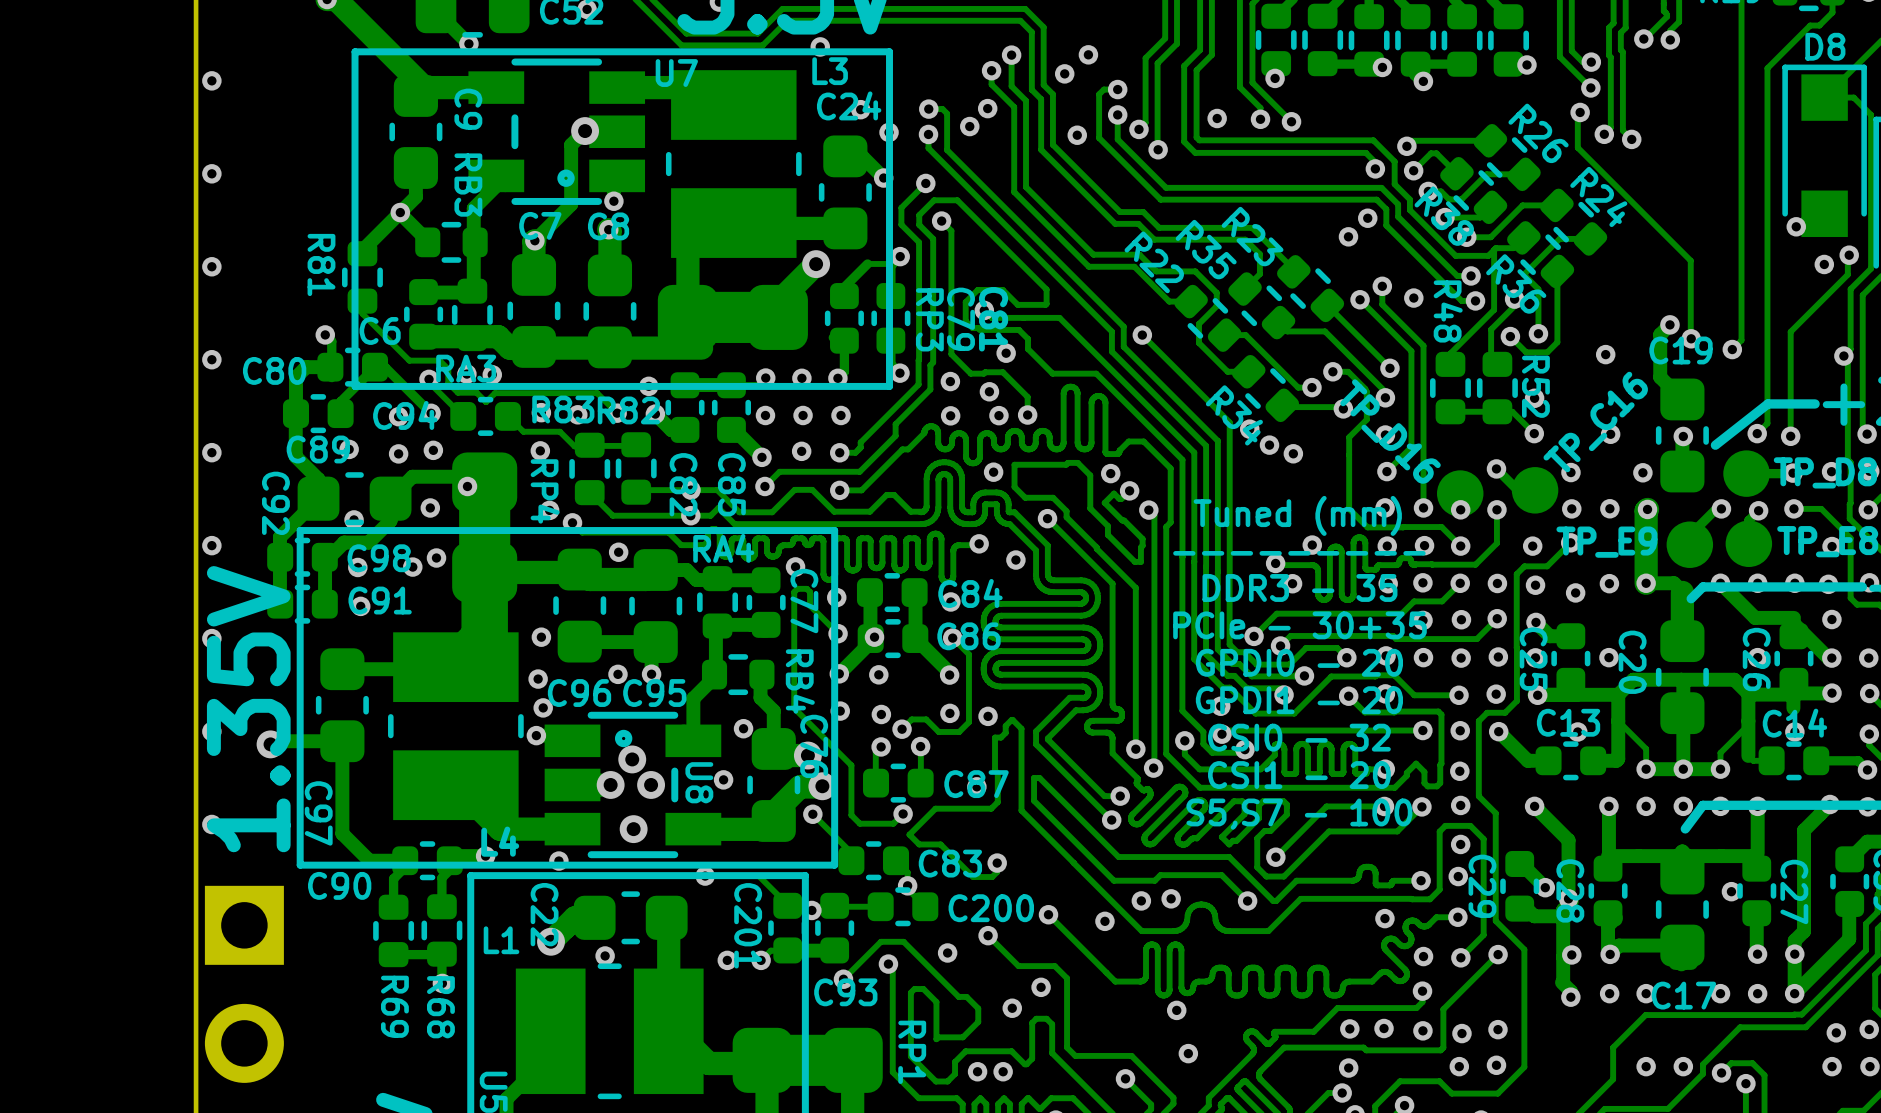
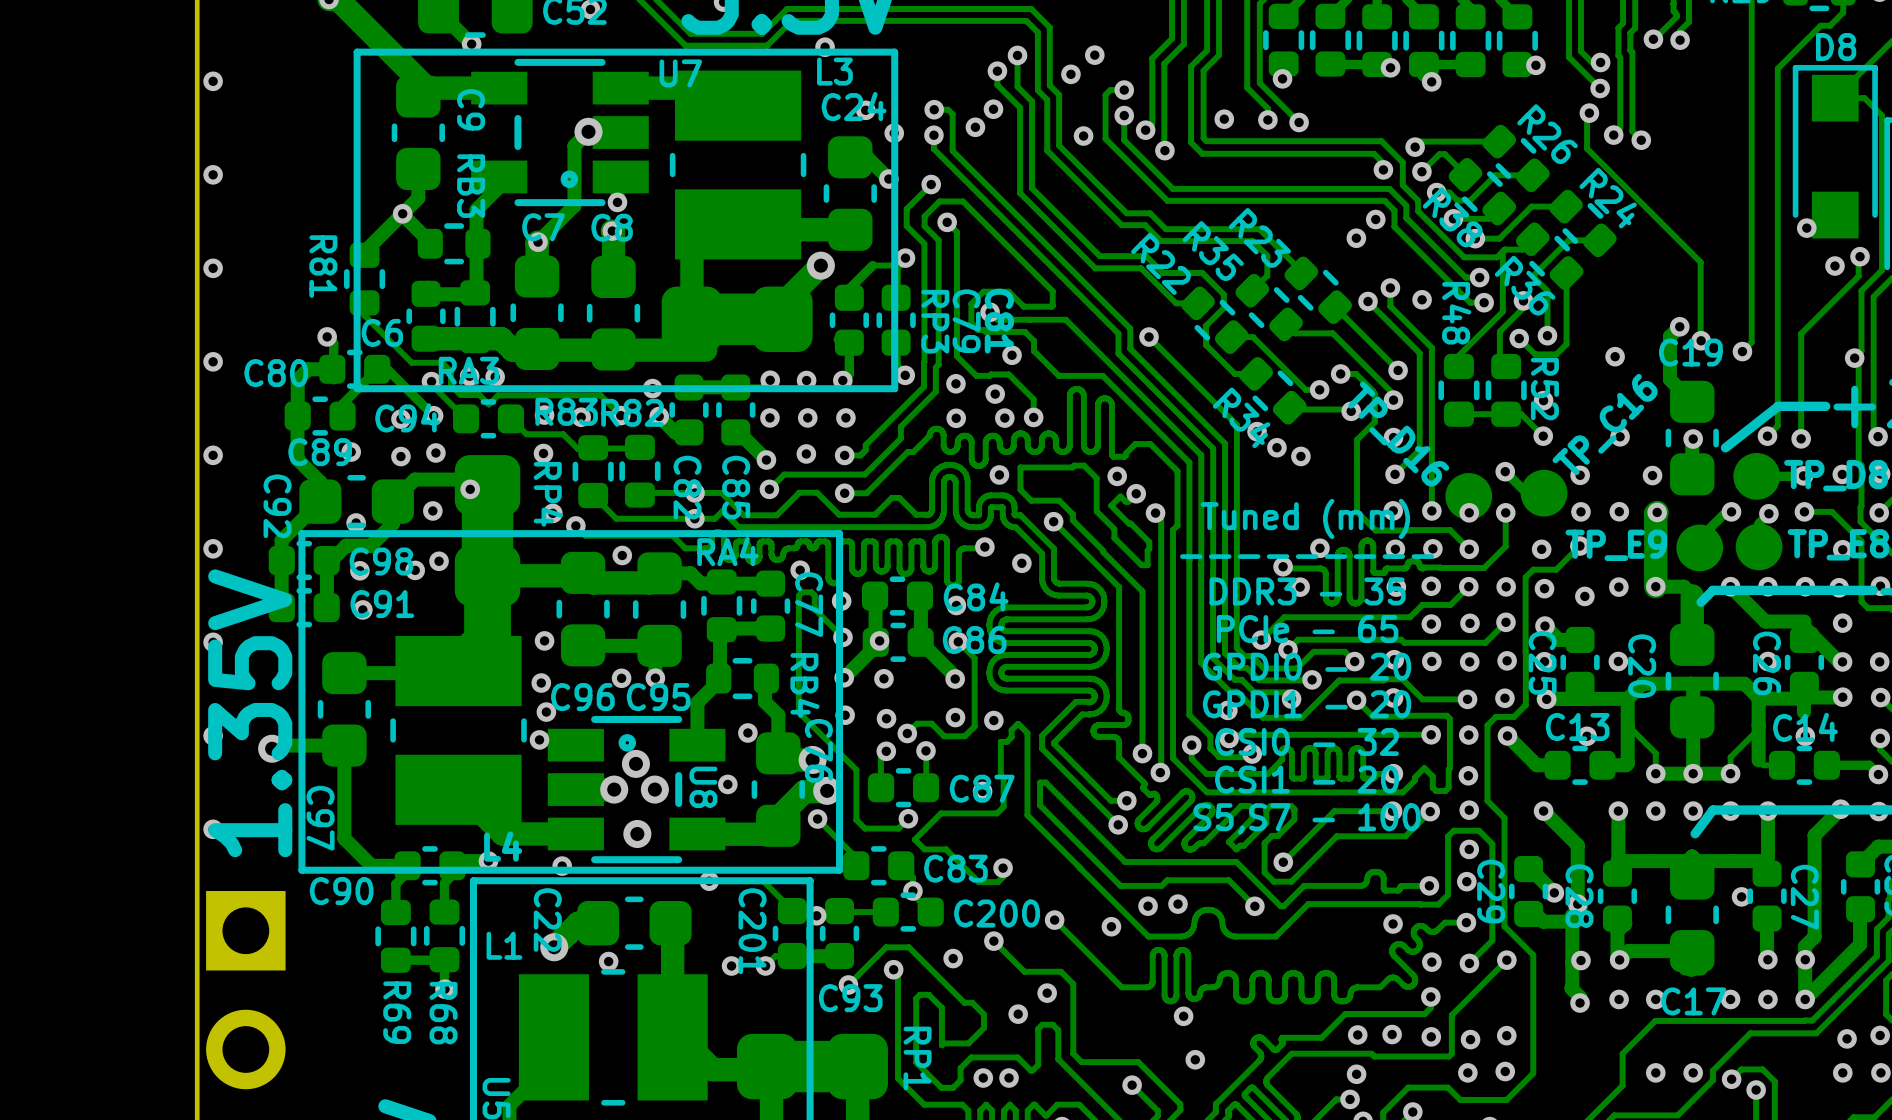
text: PCIe - 30+35 (1299, 625) -> PCIe - 65 (1307, 629)

